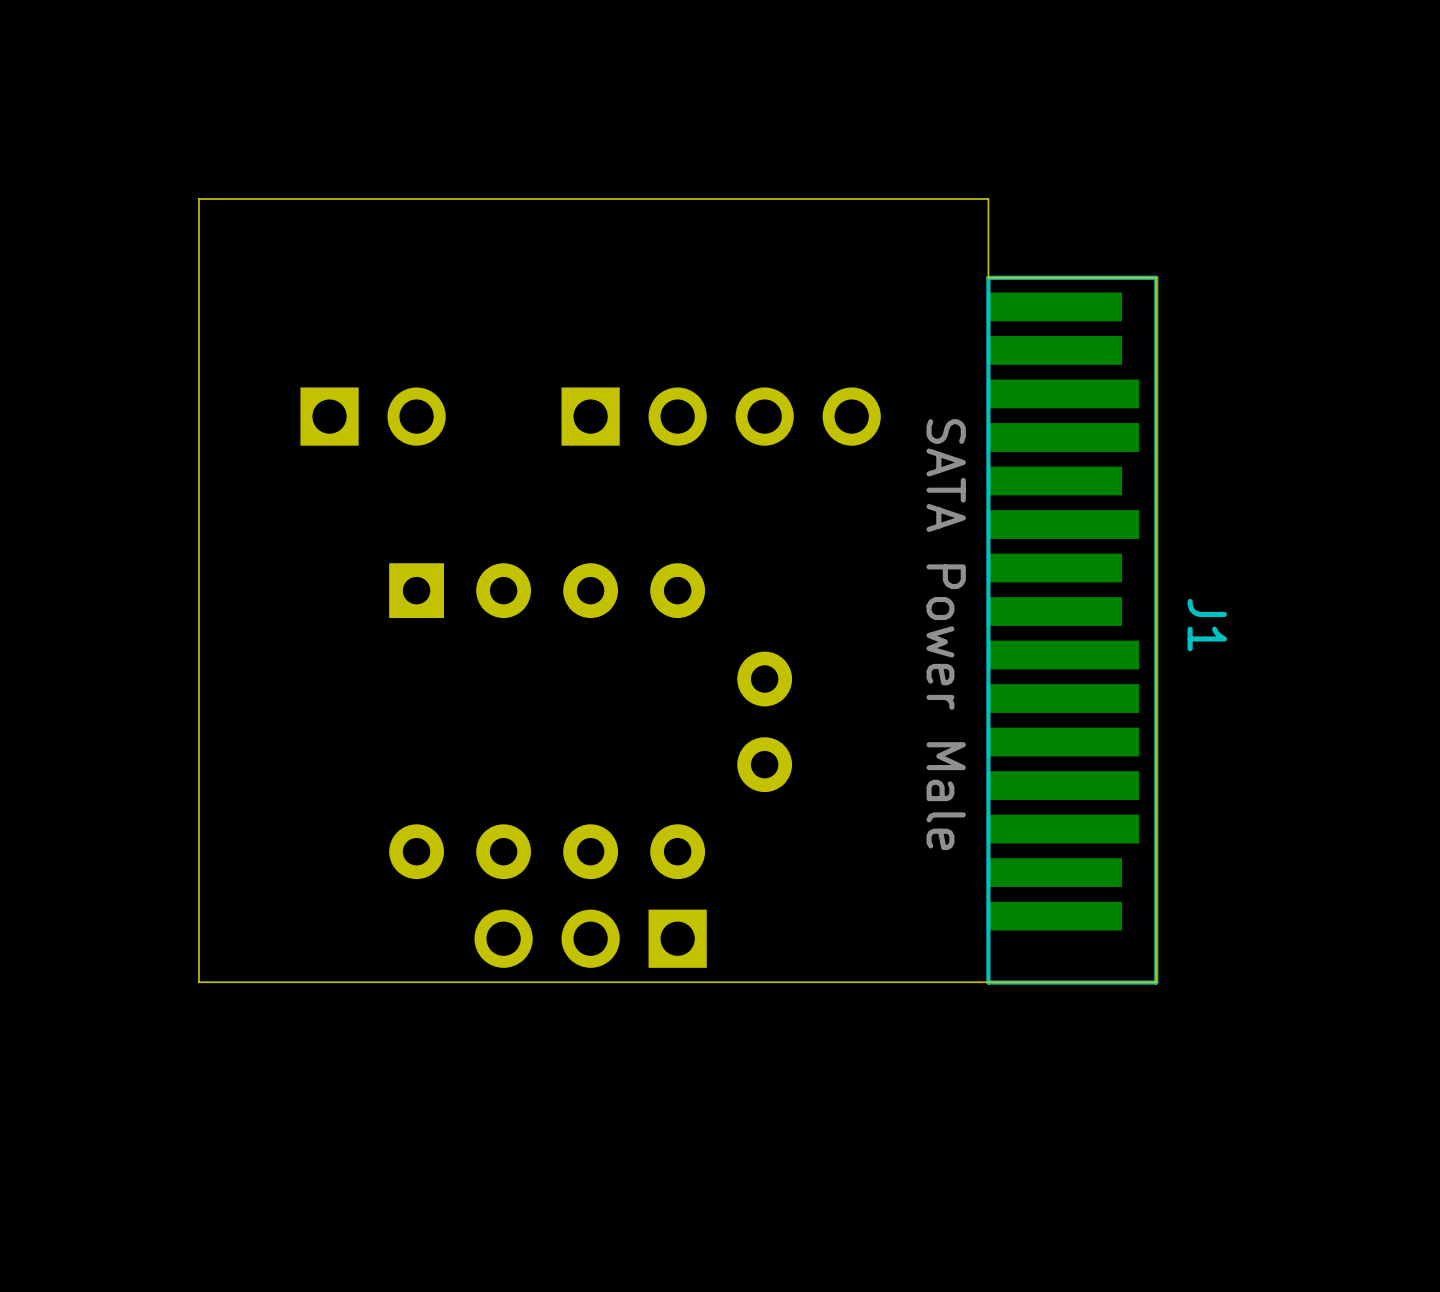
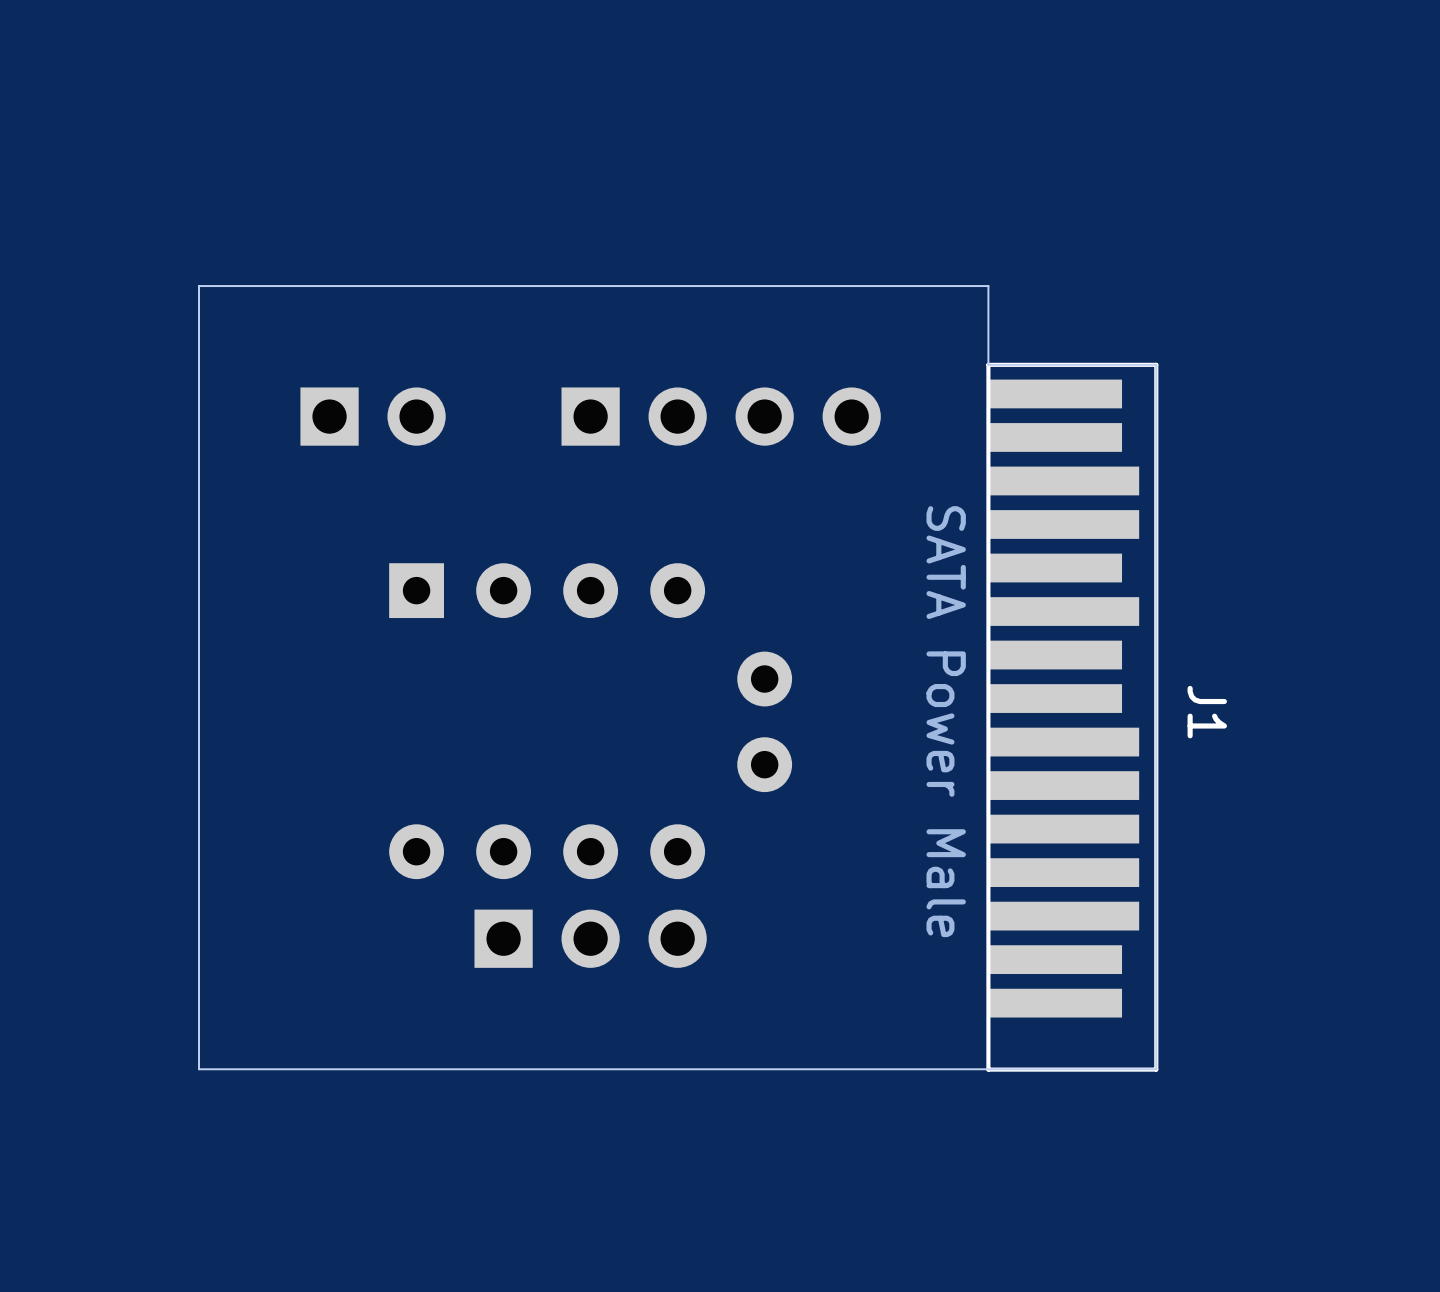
board edge: (199, 286) (199, 199) (988, 199) (988, 277) (1156, 277) (1156, 364) -> (199, 286) (988, 286) (988, 364) (1156, 364)
J1 position: (1072, 630) -> (1072, 717)
part rotation: 0° (590, 938) -> 180° (590, 938)
board edge: (1156, 982) (199, 982) -> (1156, 982) (1156, 1069) (199, 1069) (199, 982)

